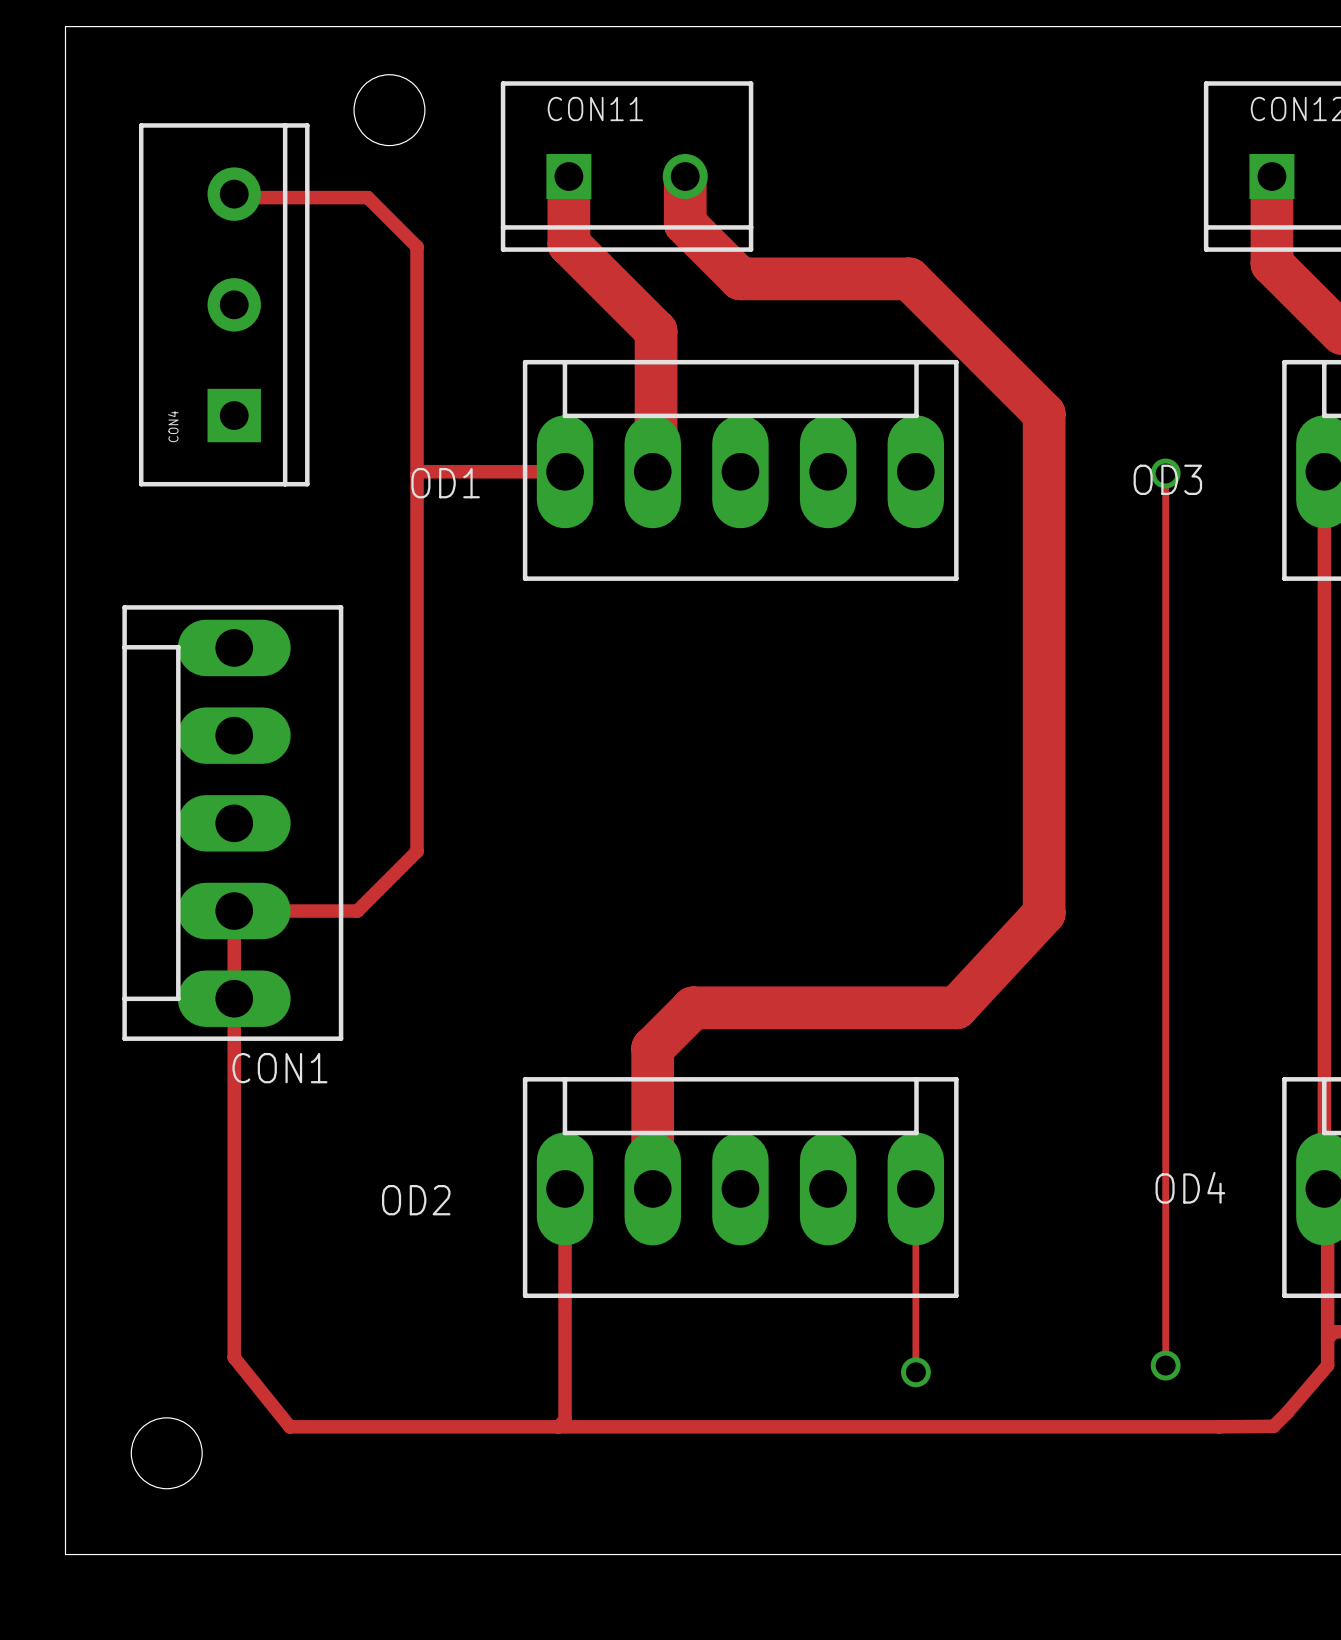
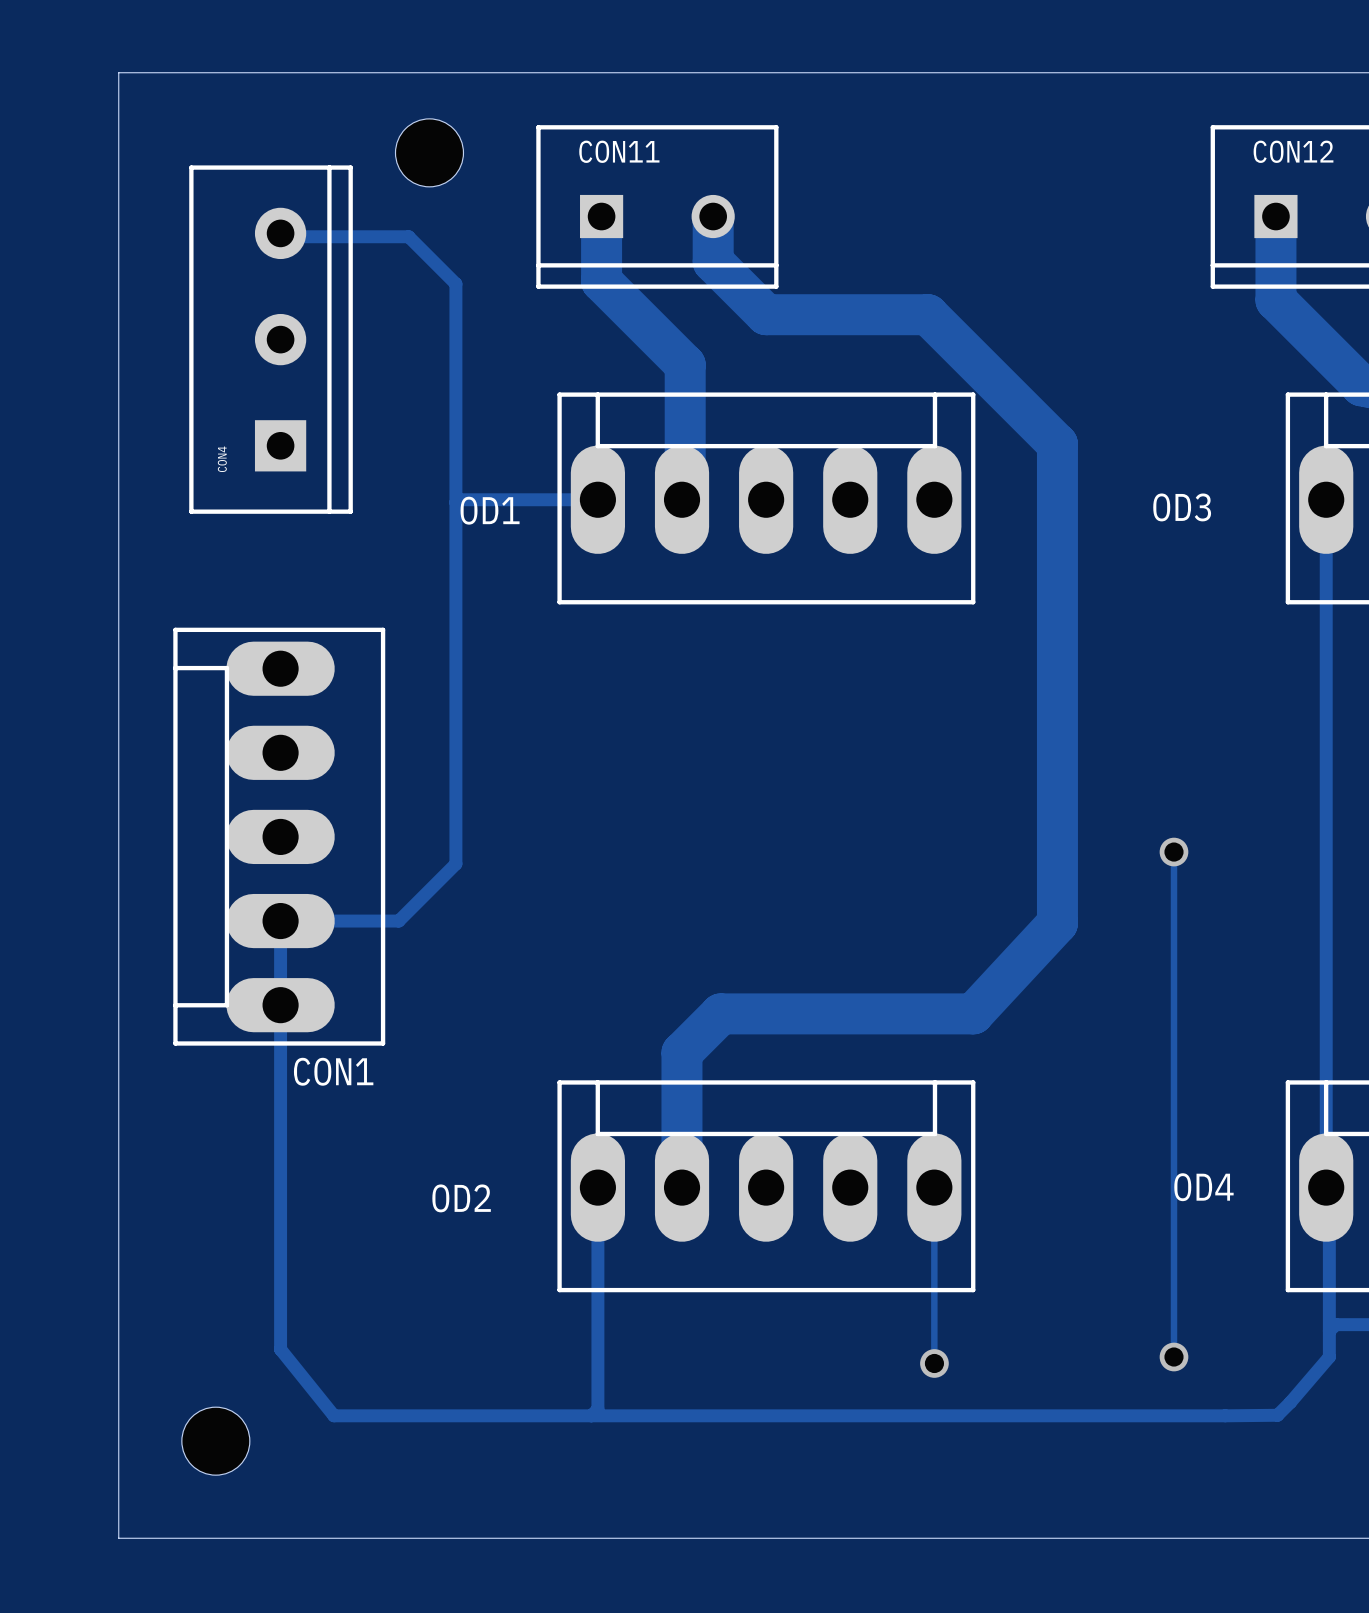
track: (1165, 473) (1165, 839) -> none
via: (1165, 473) -> none
via: none -> (1173, 852)

